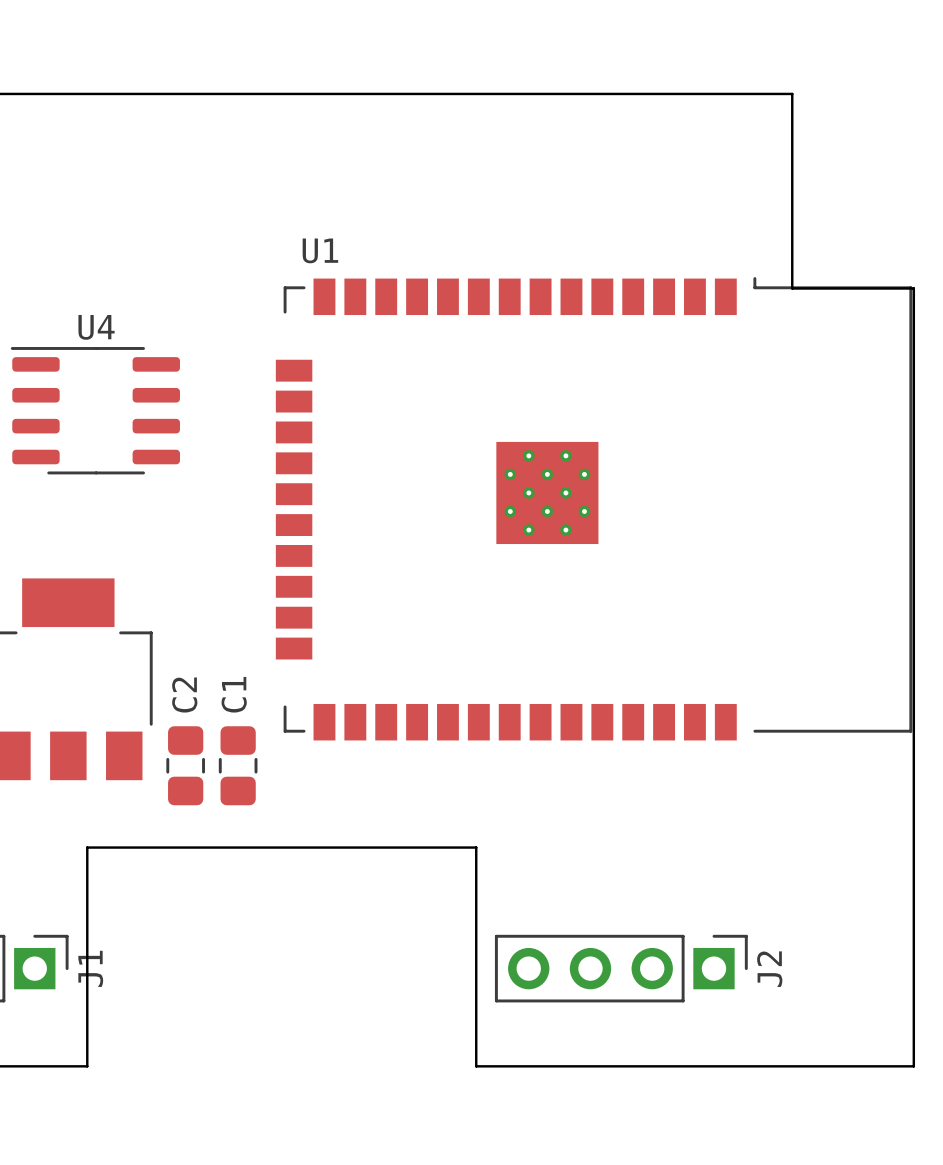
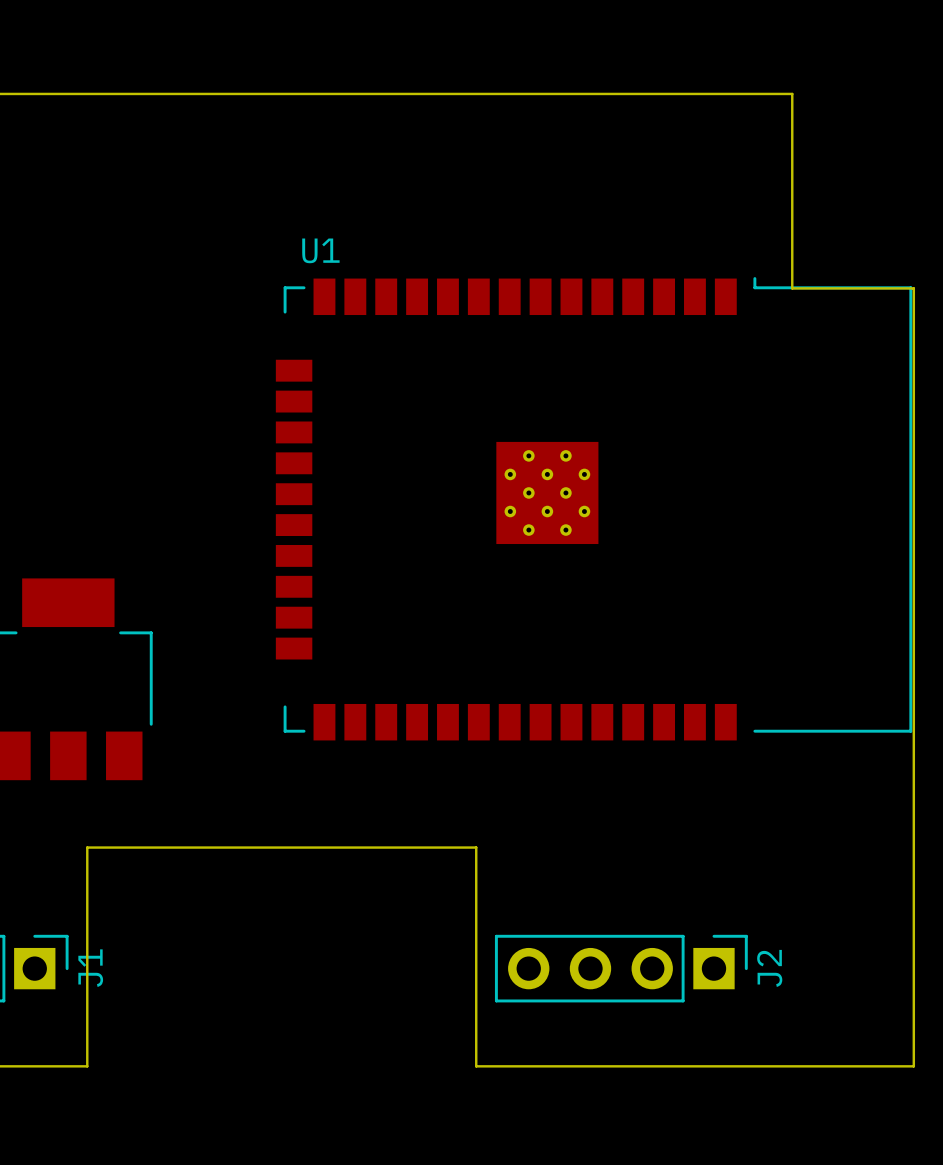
U4: (95, 410) -> none
C2: (185, 765) -> none
C1: (238, 765) -> none

